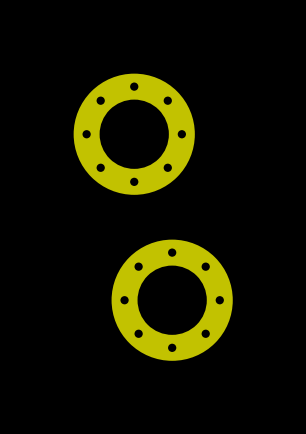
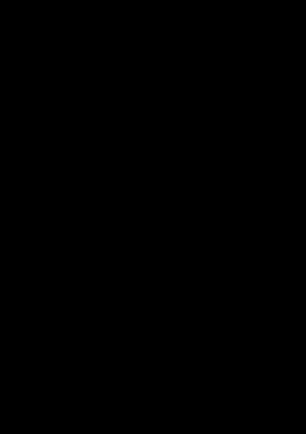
part: (134, 134) -> none
part: (172, 300) -> none

